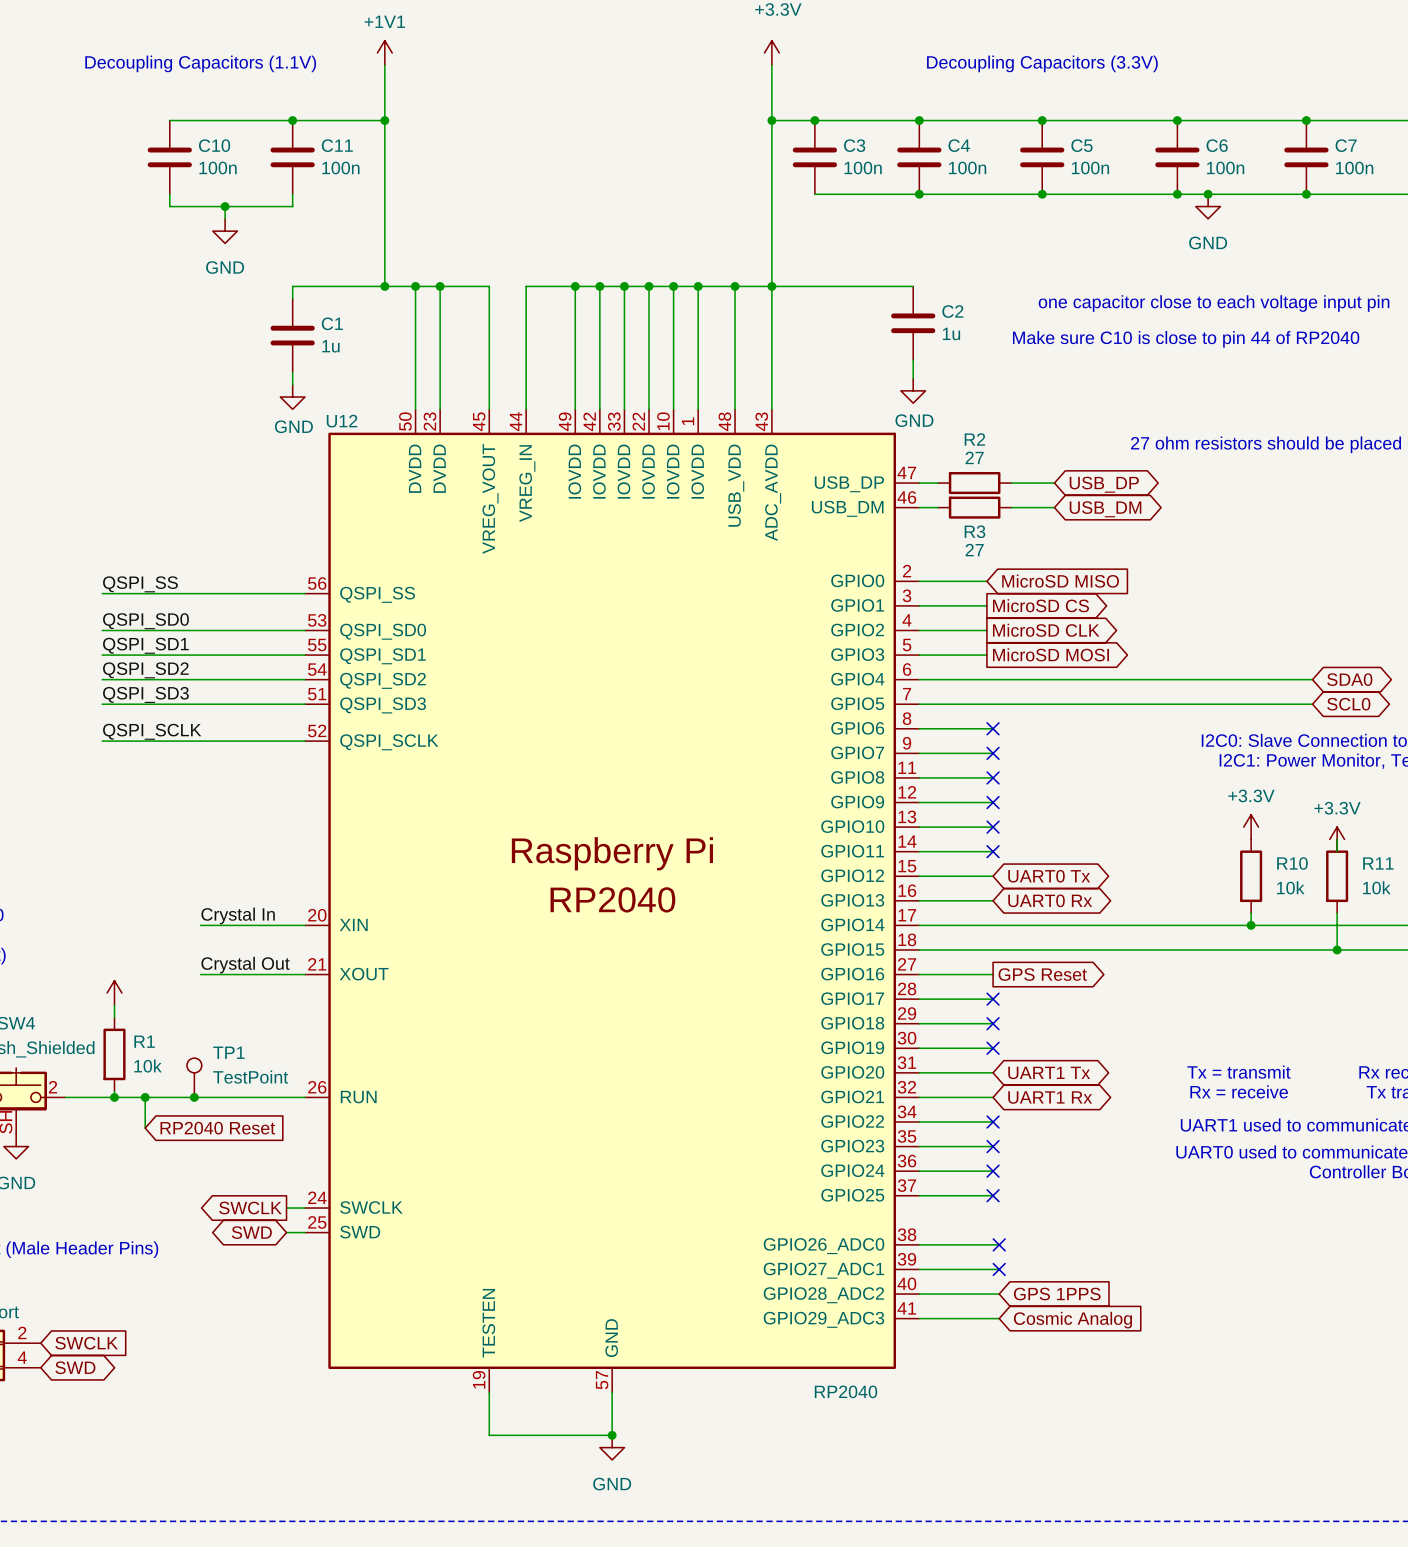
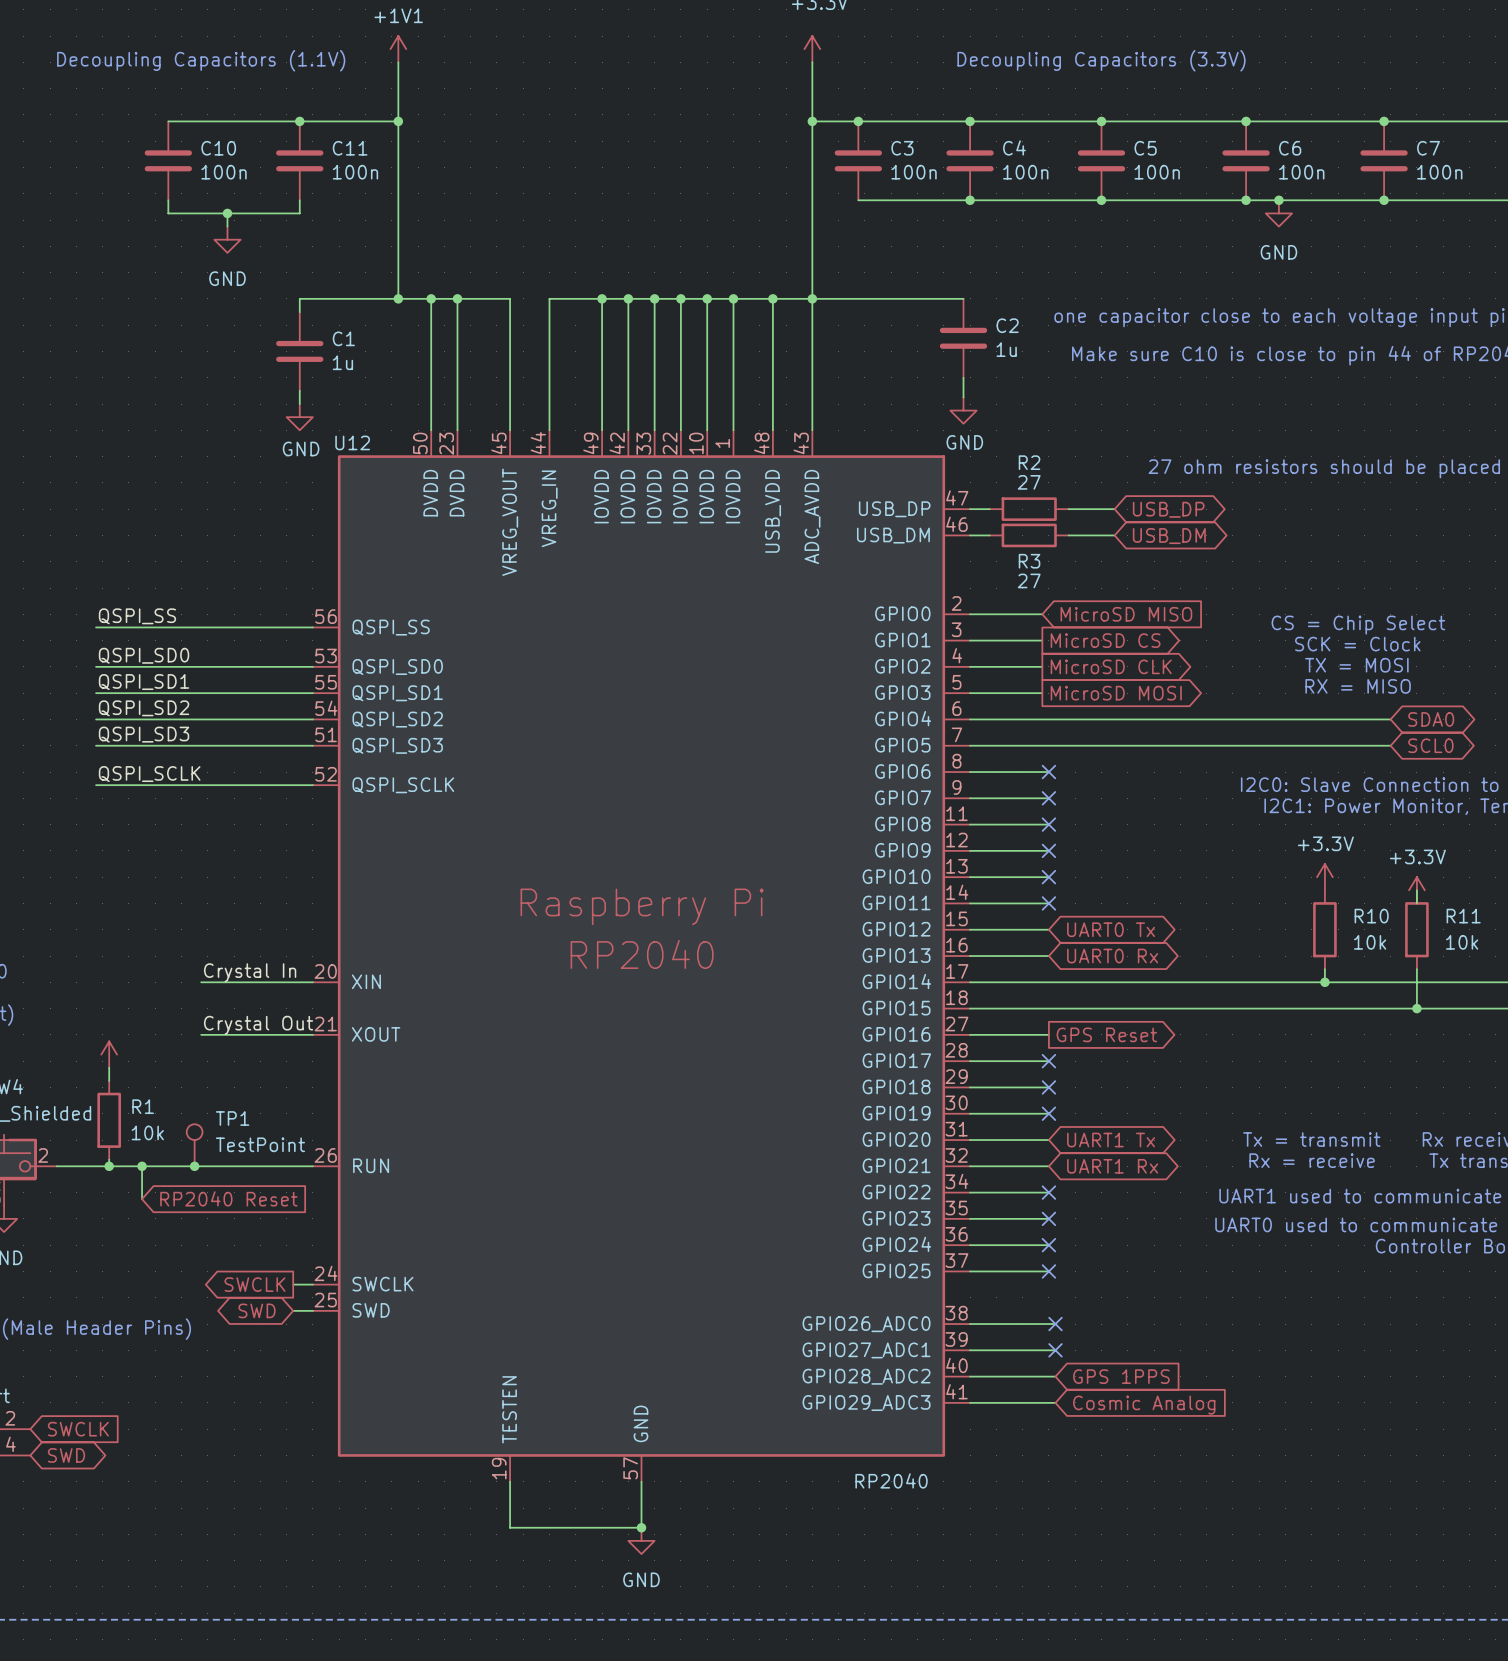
text: none -> CS = Chip Select (1358, 625)
text: none -> SCK = Clock (1357, 644)
text: none -> TX = MOSI (1356, 665)
text: none -> RX = MISO (1358, 686)

